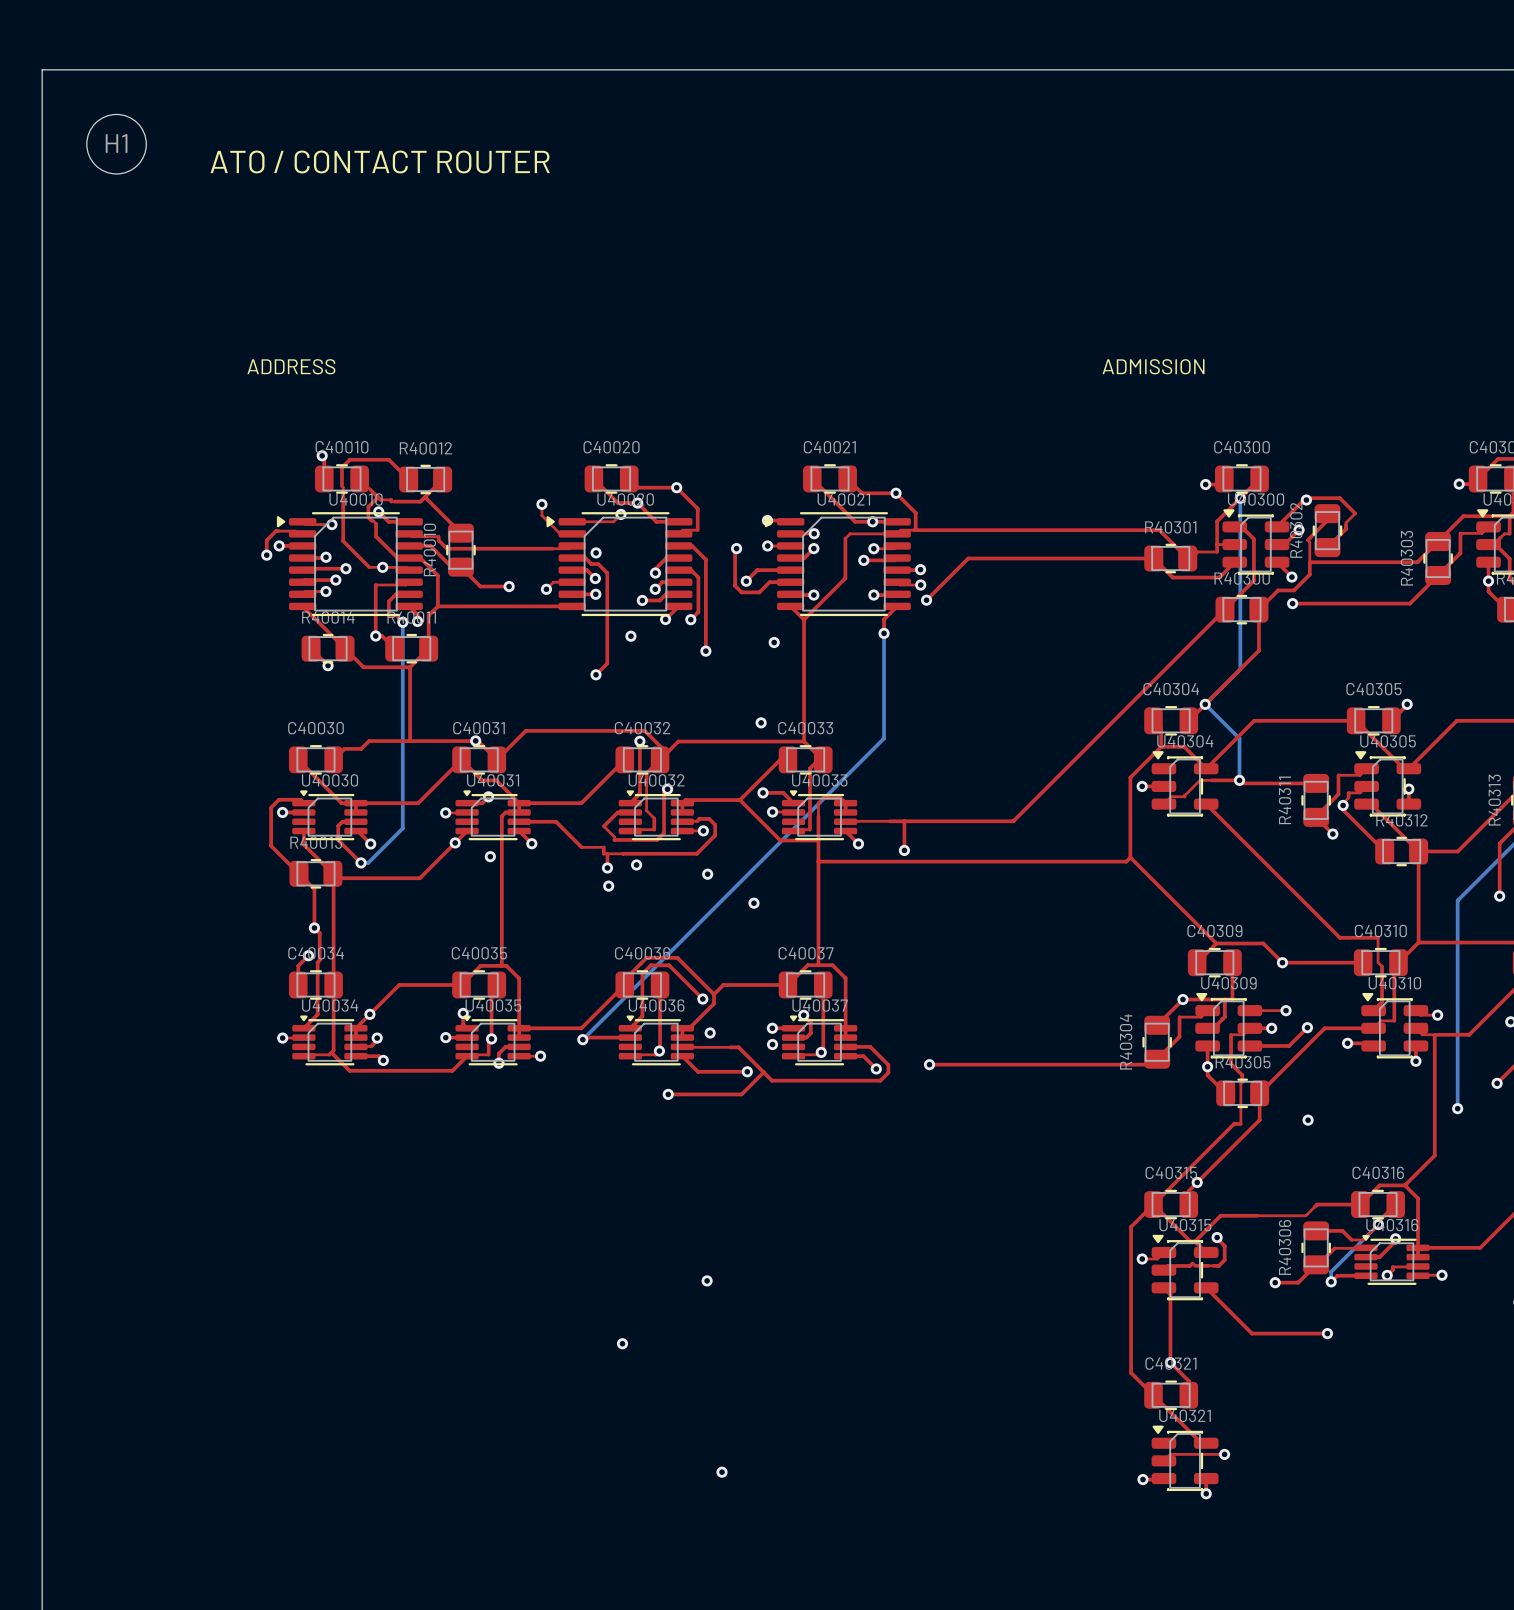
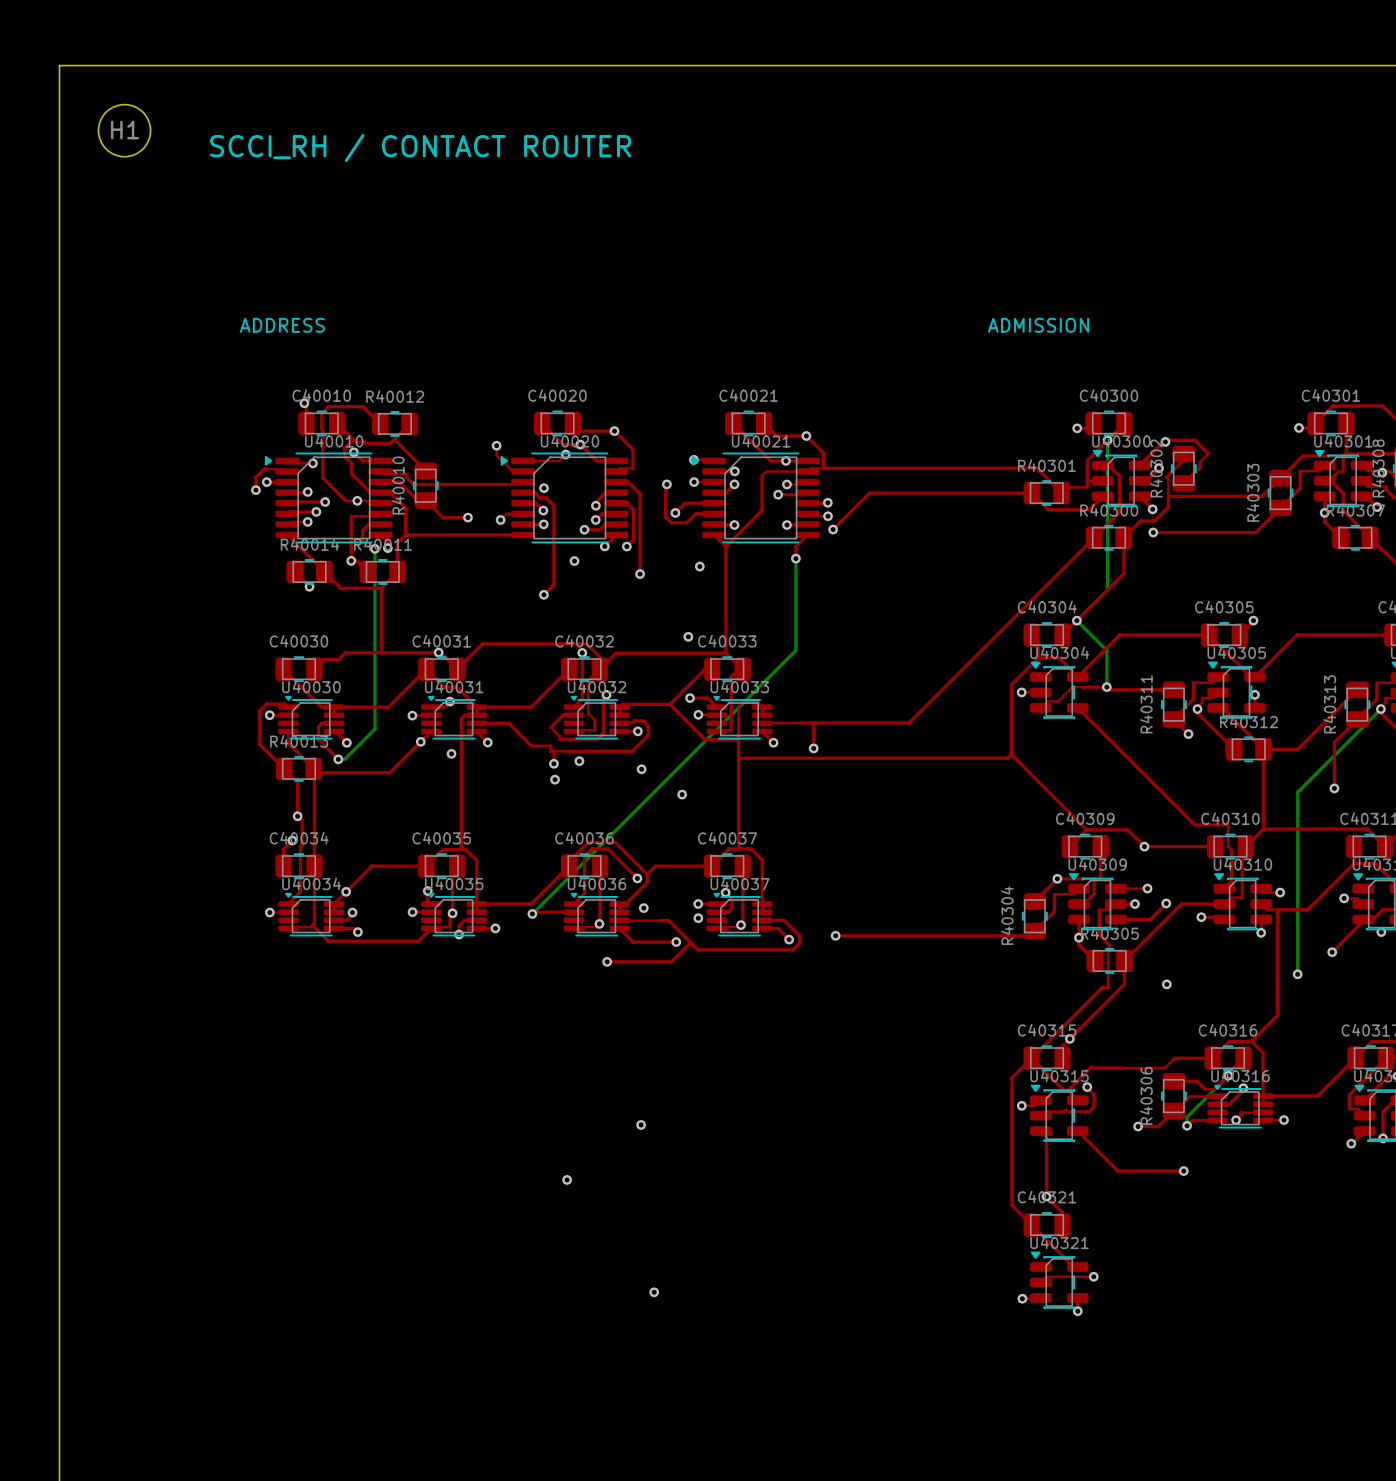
text: ATO / CONTACT ROUTER (380, 161) -> SCCI_RH / CONTACT ROUTER (420, 148)

